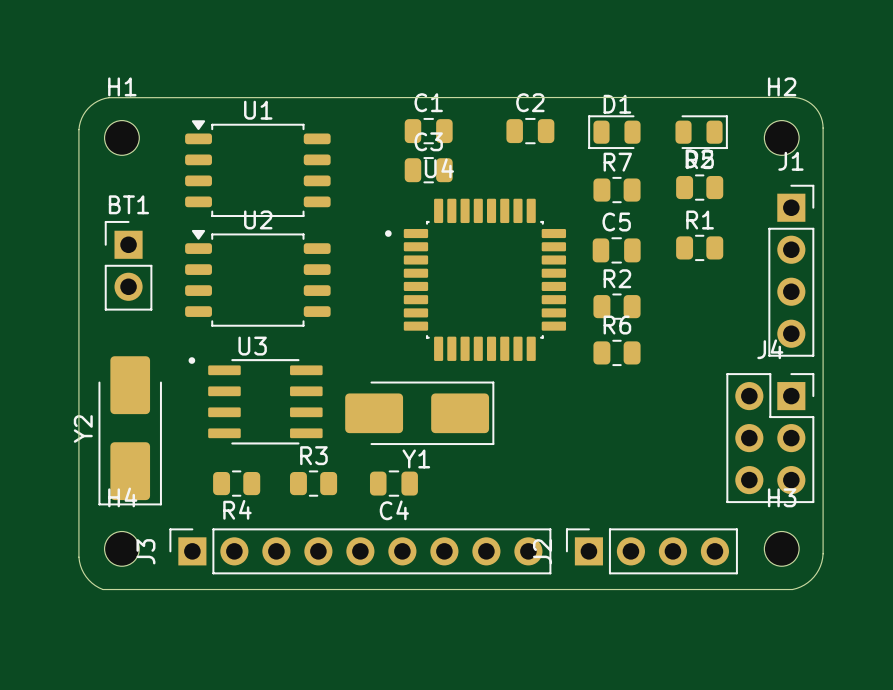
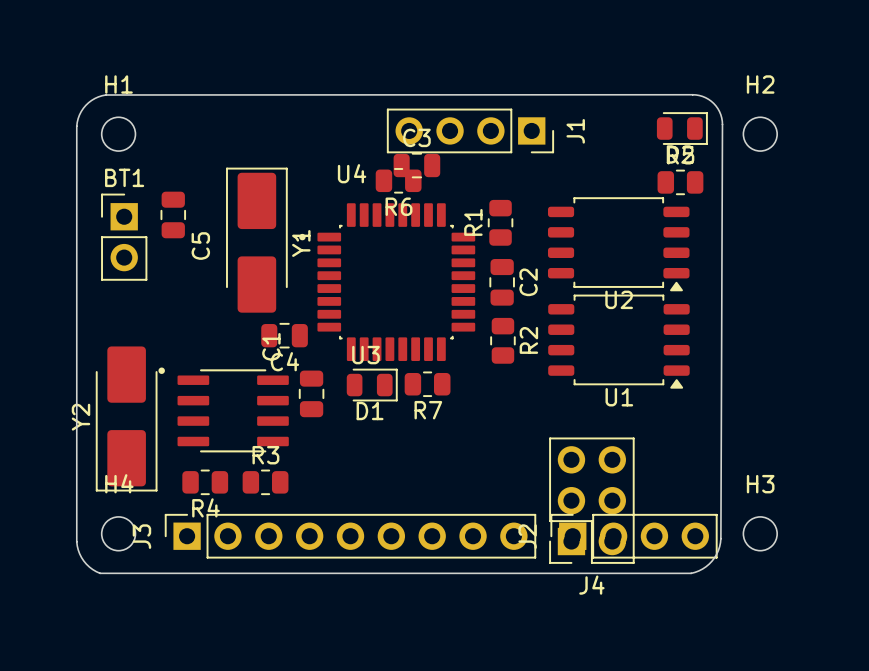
board edge: (712, 97) (799, 98) (814, 106) (822, 121) (823, 553) (818, 570) (807, 582) (792, 589) (102, 589) -> (692, 94) (702, 96) (713, 103) (719, 111) (722, 124) (720, 538) (716, 554) (706, 566) (691, 573) (100, 573)
C1 name position: C1 (428, 102) -> C1 (271, 346)
C1 rotation: 0° (428, 131) -> 90° clockwise (311, 393)
C1 position: (428, 131) -> (311, 393)
C2 rotation: 0° (530, 131) -> 90° clockwise (502, 282)
C2 position: (530, 131) -> (502, 282)
D1 rotation: 0° (614, 132) -> 180° (372, 385)
D1 position: (614, 132) -> (372, 385)
R7 name position: R7 (617, 162) -> R7 (428, 410)
U1 rotation: 0° (257, 168) -> 180° (618, 341)
U1 position: (257, 168) -> (618, 341)
R7 position: (617, 190) -> (427, 384)
R1 name position: R1 (700, 220) -> R1 (473, 222)
R1 rotation: 0° (699, 247) -> 90° clockwise (500, 222)
R1 position: (699, 247) -> (500, 222)
C5 rotation: 0° (616, 250) -> 90° clockwise (173, 214)
C5 position: (616, 250) -> (173, 214)
BT1 position: (128, 265) -> (124, 237)
J1 rotation: 0° (791, 270) -> 90° clockwise (470, 130)
J1 position: (791, 270) -> (470, 130)
U2 rotation: 0° (257, 278) -> 180° (618, 244)
U2 position: (257, 278) -> (618, 244)
U4 position: (475, 279) -> (387, 282)
R2 rotation: 0° (617, 306) -> 90° clockwise (502, 340)
R2 position: (617, 306) -> (502, 340)
R6 name position: R6 (617, 325) -> R6 (399, 206)
U3 name position: U3 (252, 346) -> U3 (365, 355)
R6 position: (617, 352) -> (398, 180)
U3 position: (255, 400) -> (223, 409)
Y1 rotation: 0° (419, 413) -> 90° counterclockwise (256, 240)
Y1 position: (419, 413) -> (256, 240)
J4 rotation: 0° (770, 438) -> 180° (591, 500)
J4 position: (770, 438) -> (591, 500)
R4 position: (236, 483) -> (205, 482)
R3 position: (313, 483) -> (265, 482)
C4 position: (393, 483) -> (284, 335)

